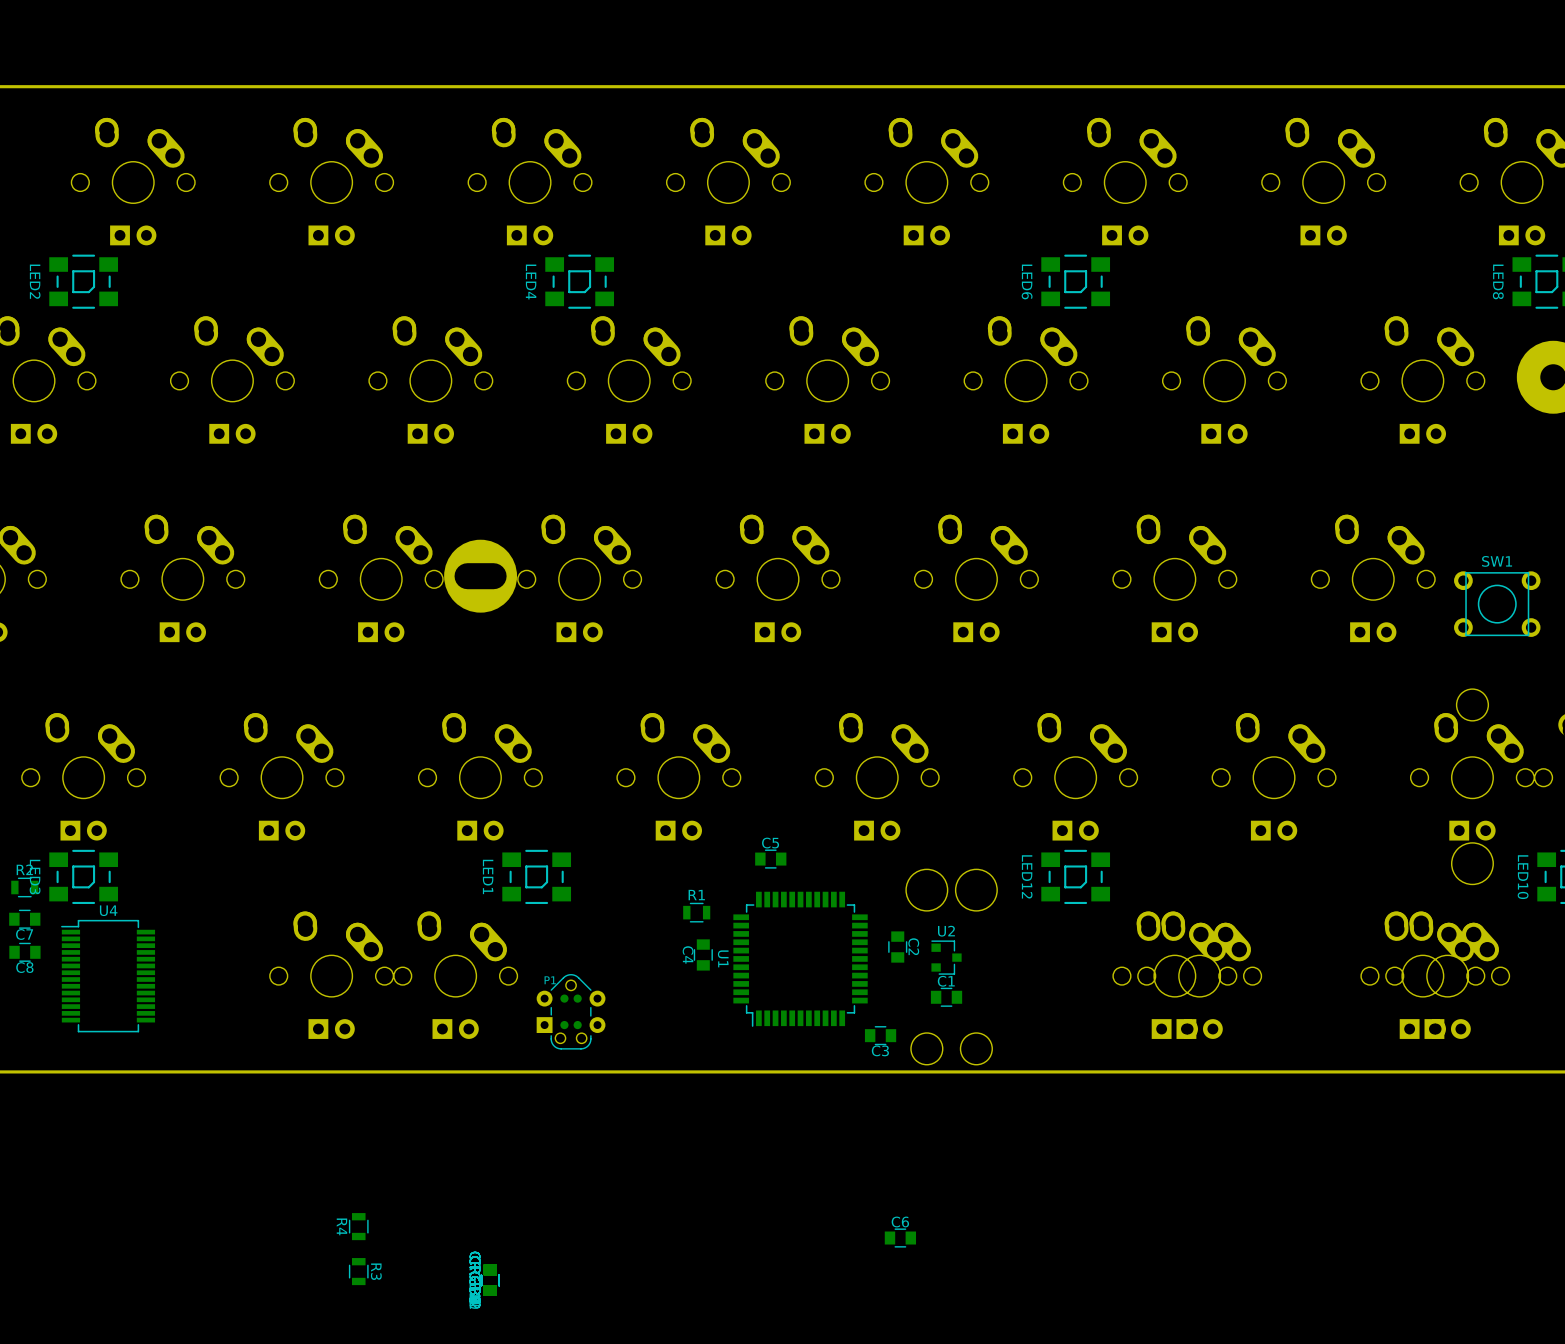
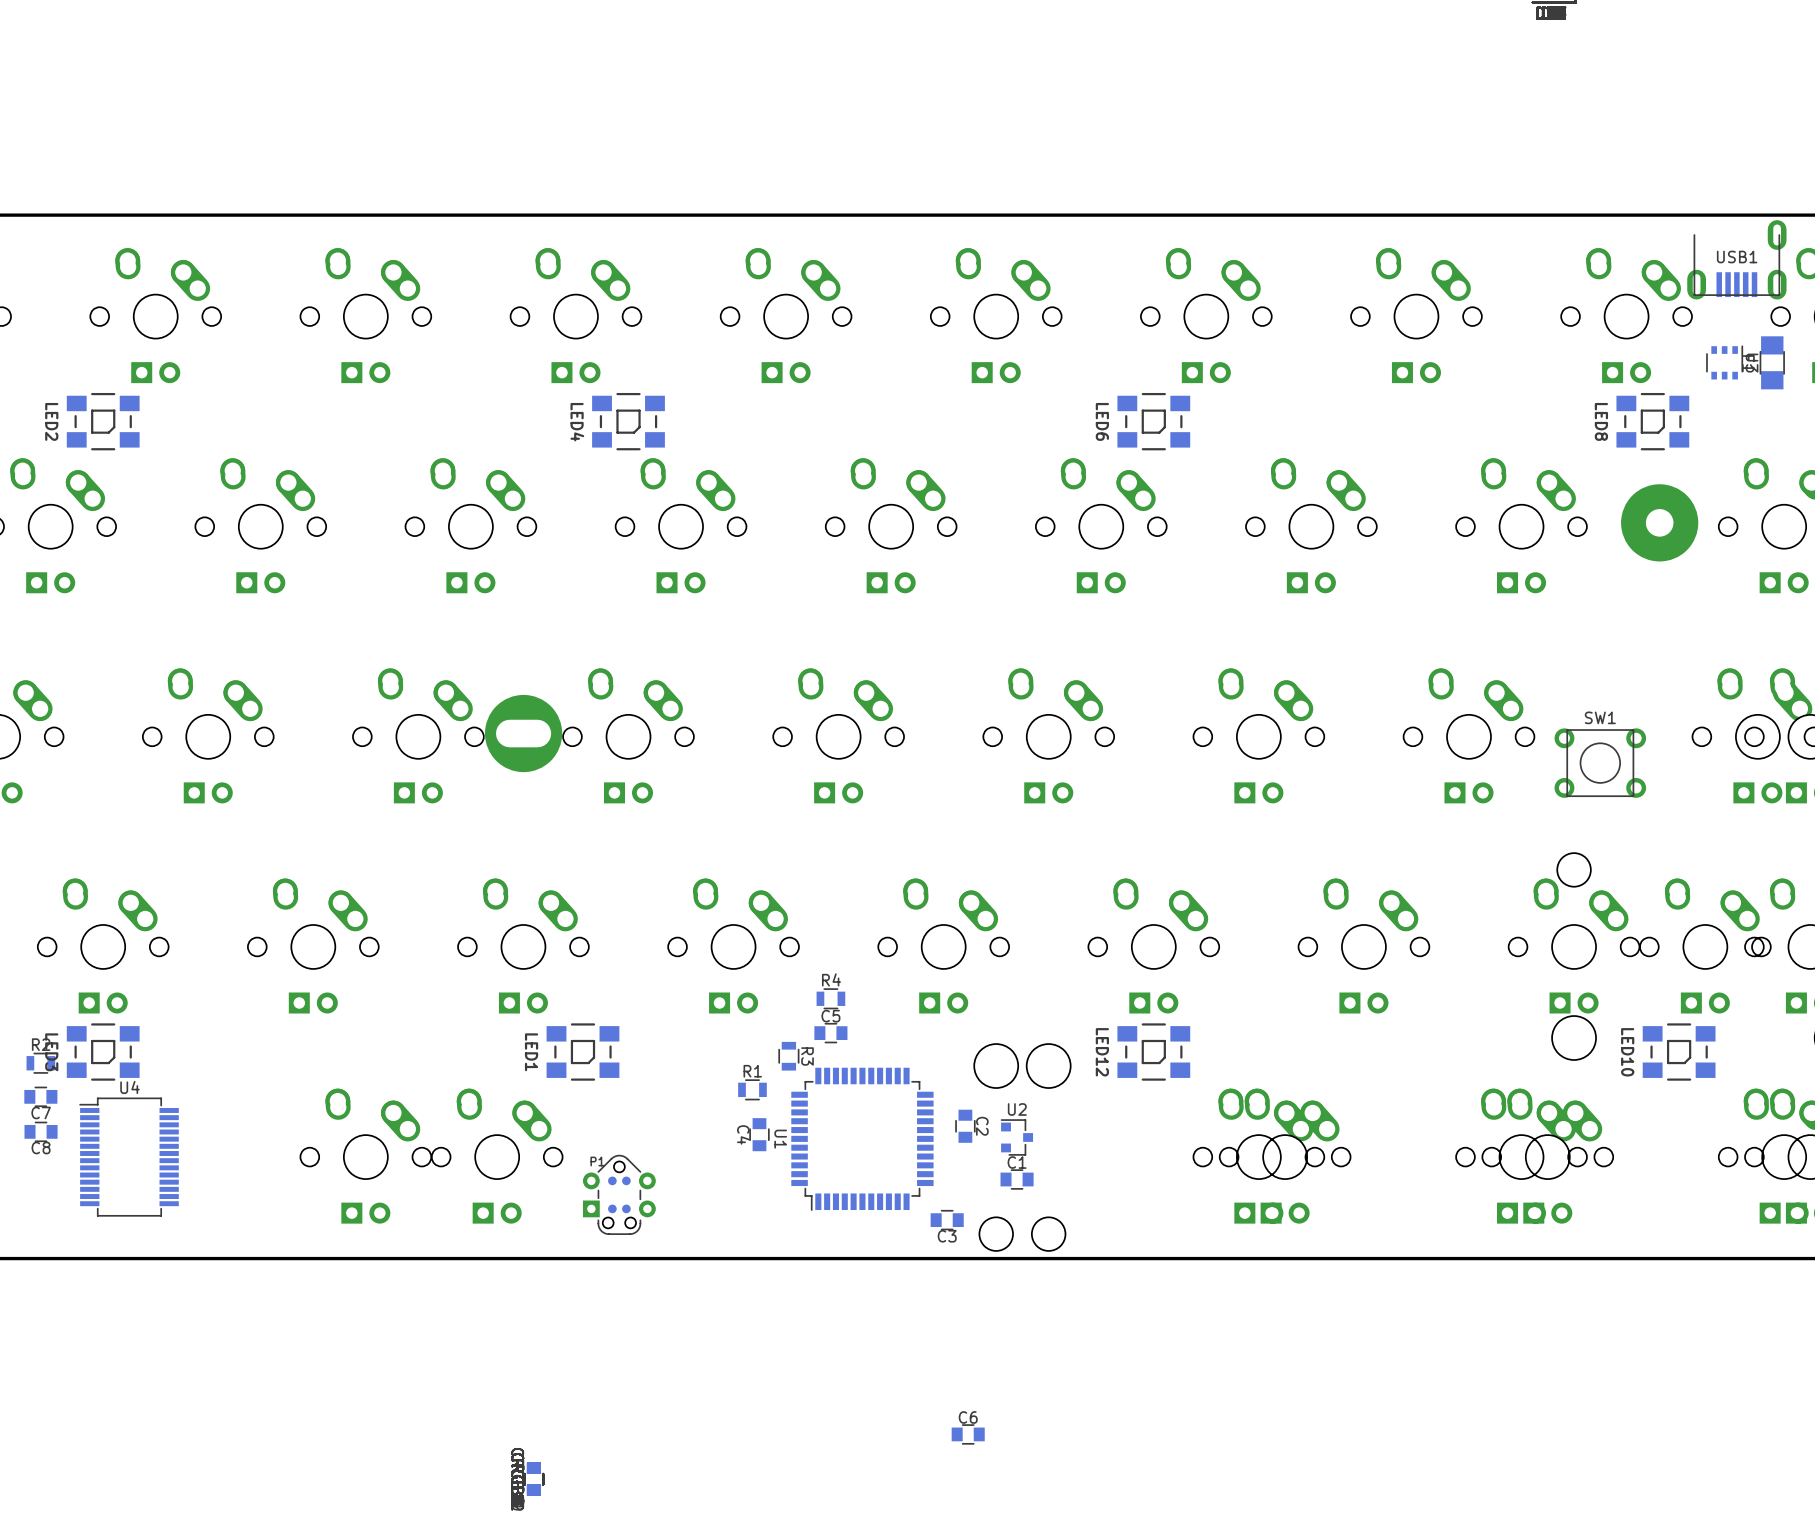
R4 rotation: 0° (358, 1226) -> 90° clockwise (830, 998)
R4 position: (358, 1226) -> (830, 998)
R3 position: (358, 1271) -> (788, 1056)

